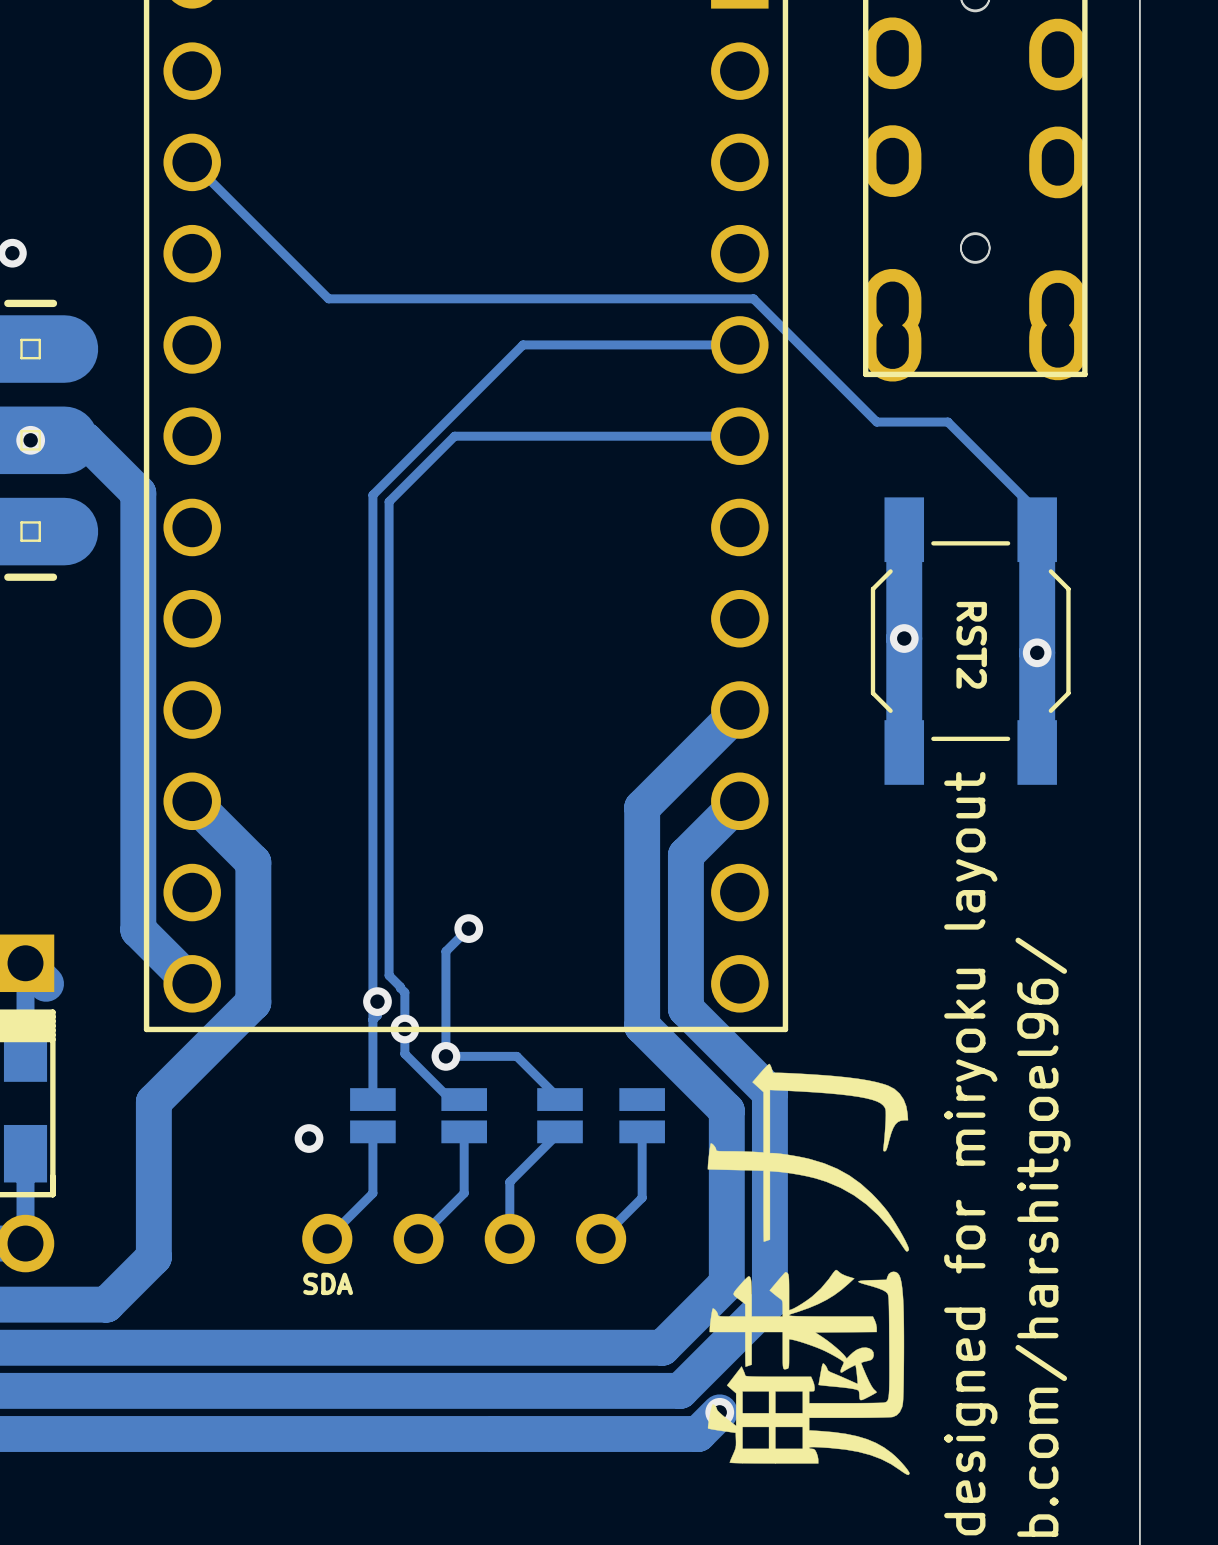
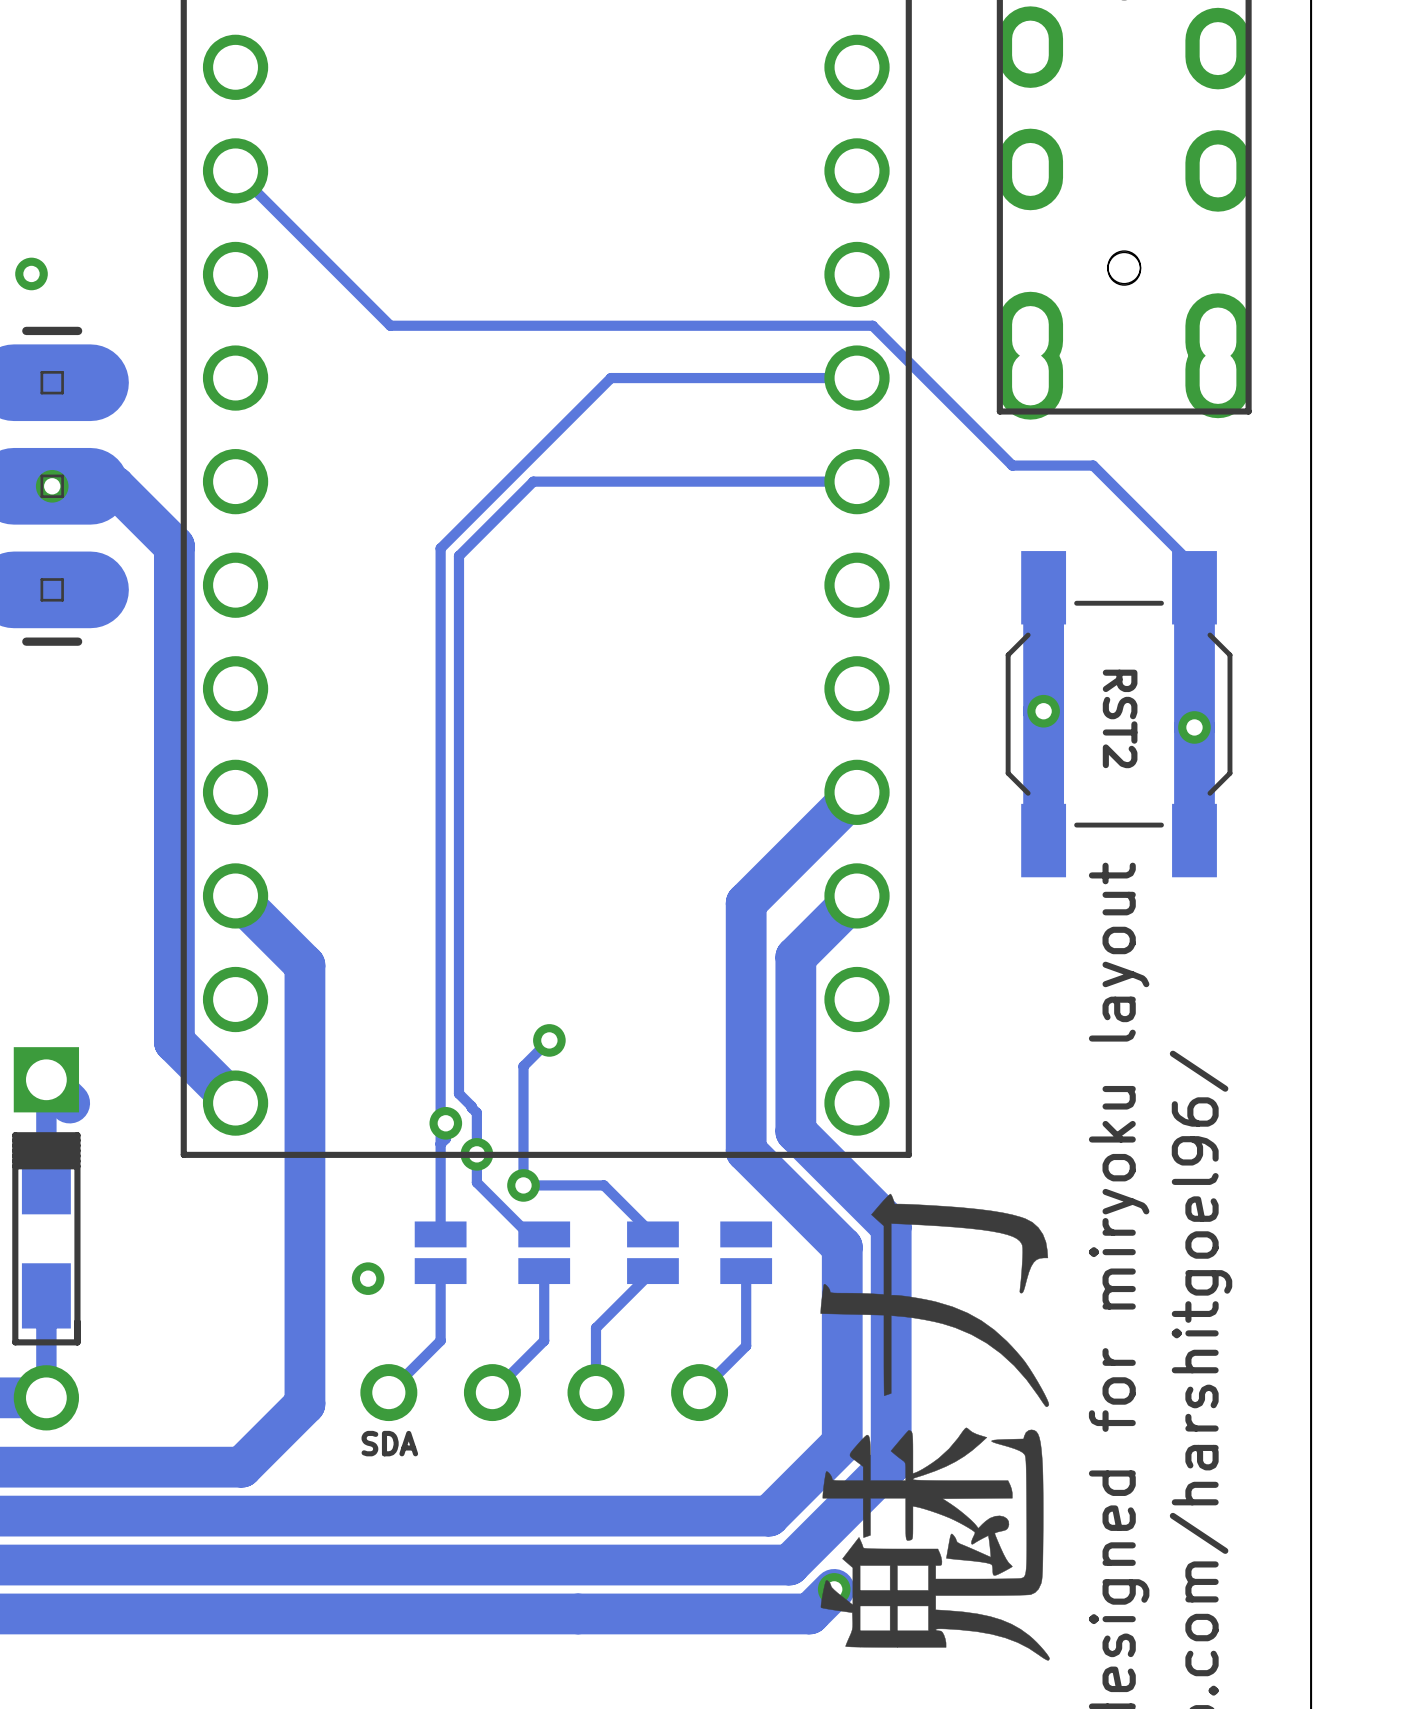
track: (253, 1002) (153, 1101) (153, 1257) (106, 1304) -> (304, 1124) (304, 1403) (241, 1467) (138, 1467)

